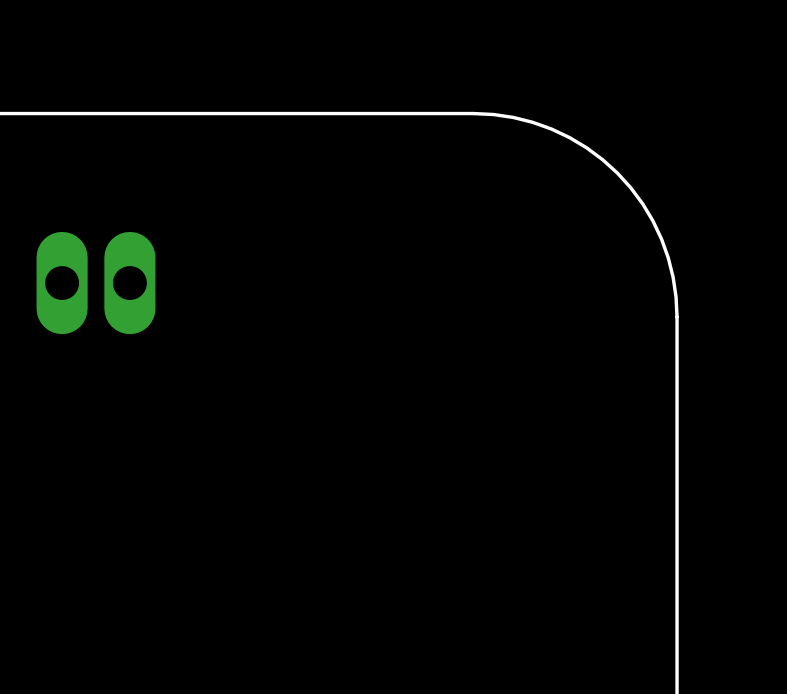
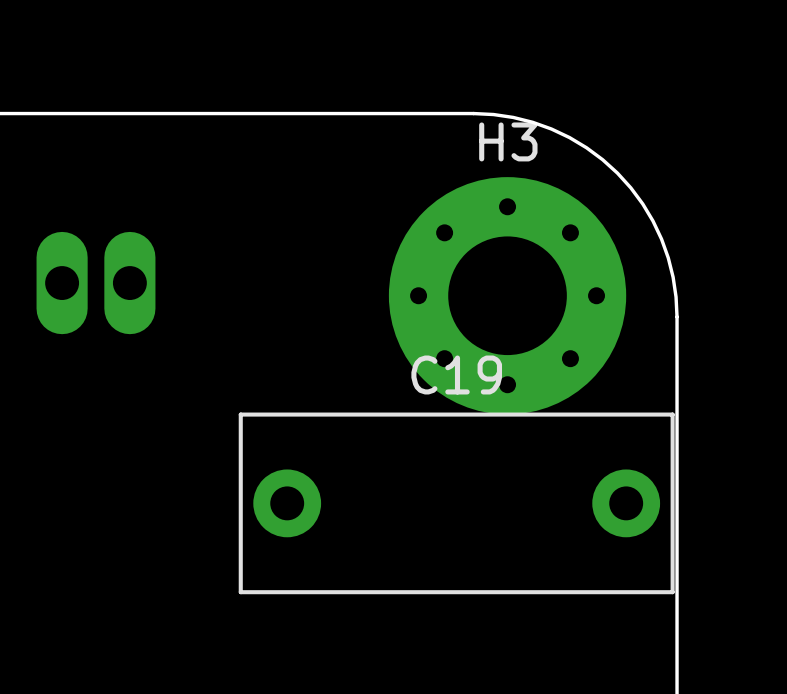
H3: none -> (507, 295)
C19: none -> (456, 503)

